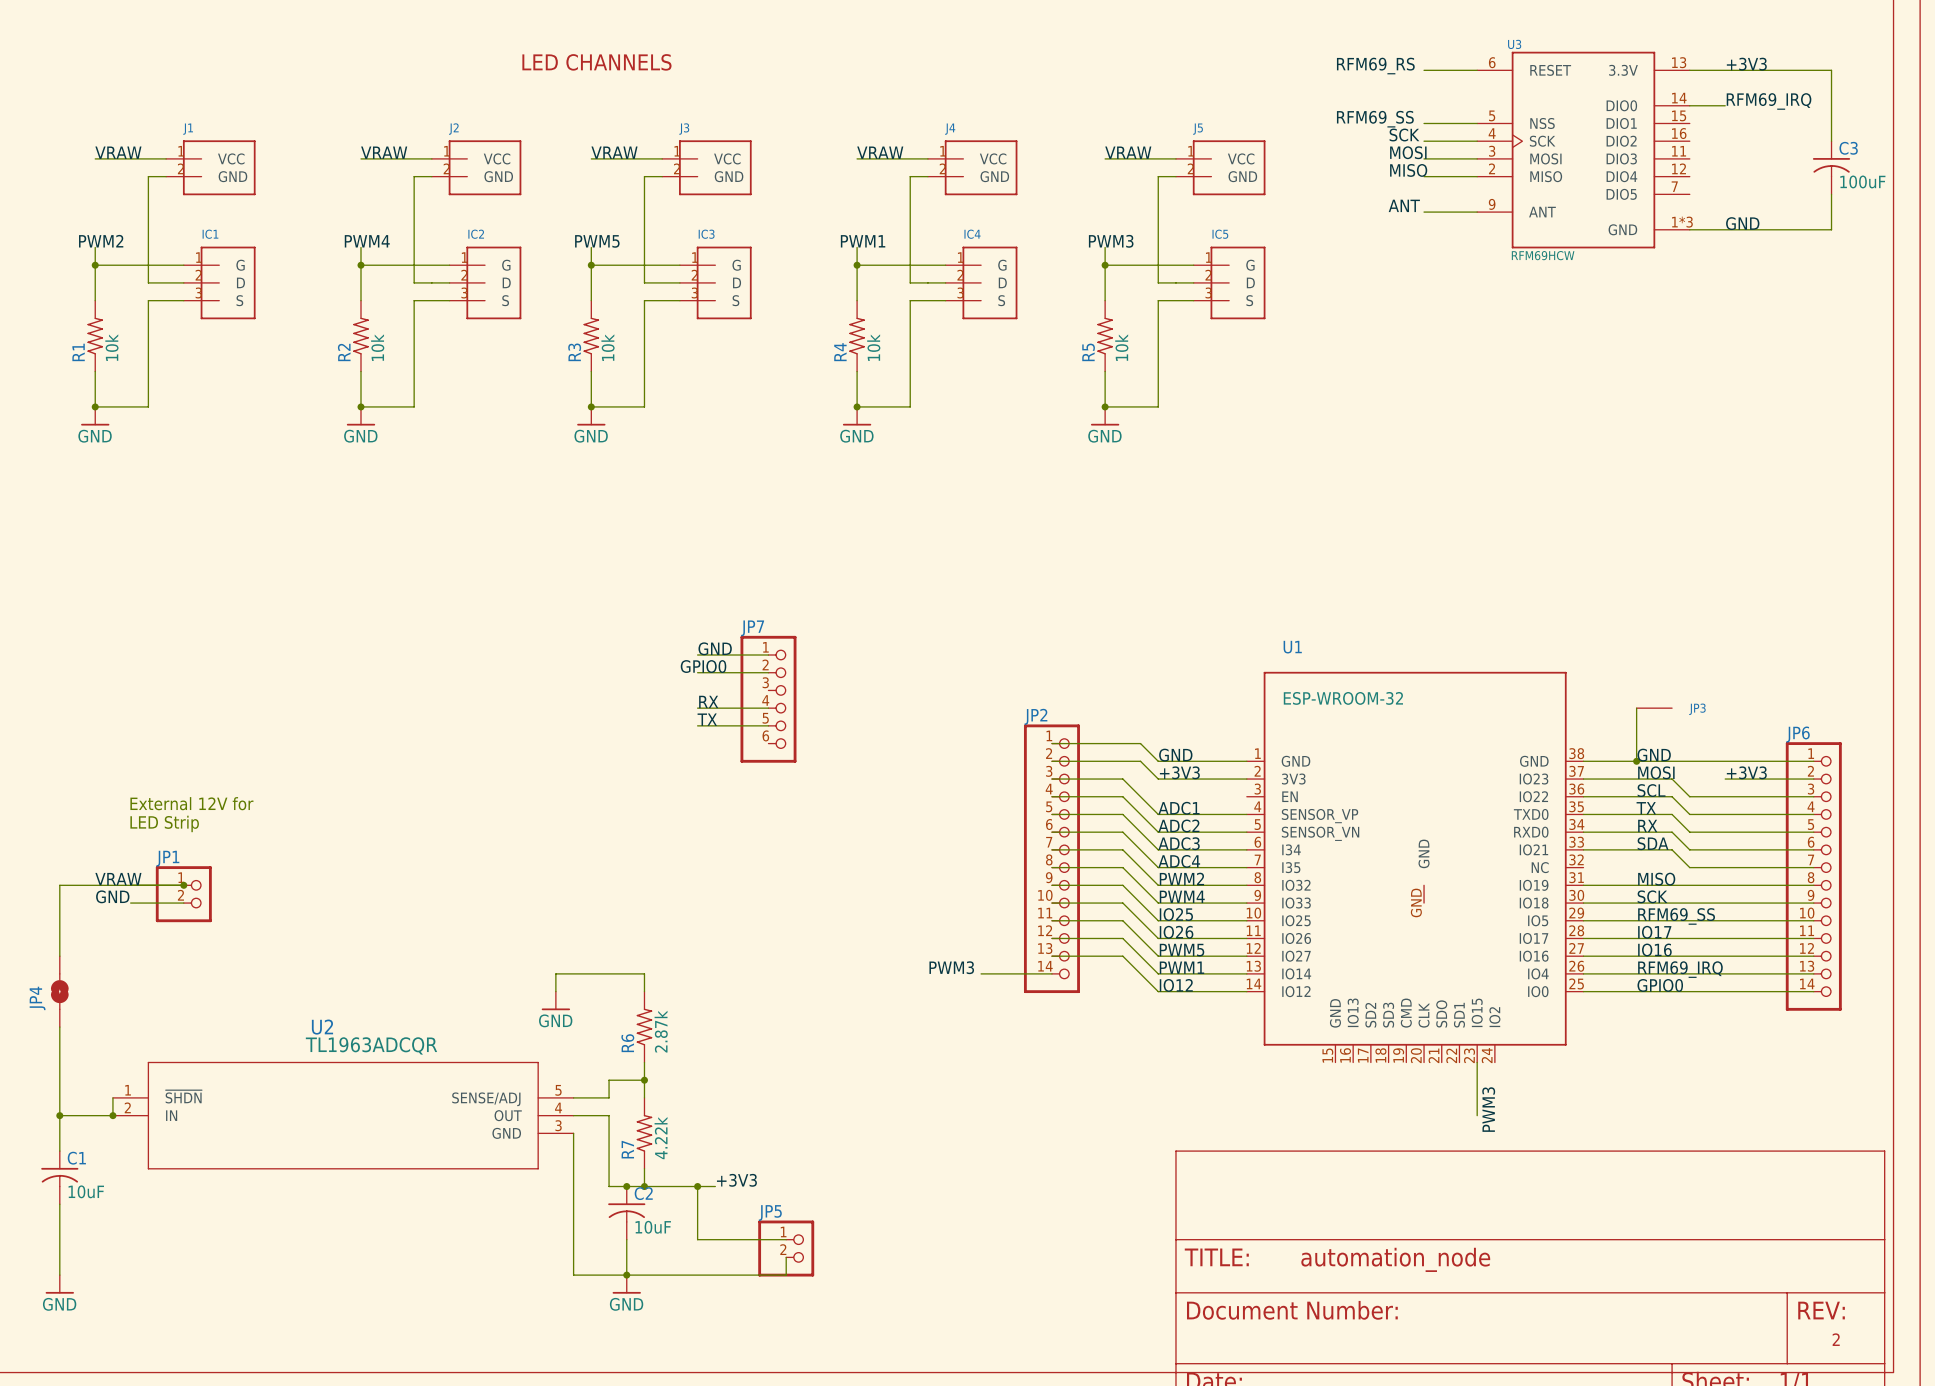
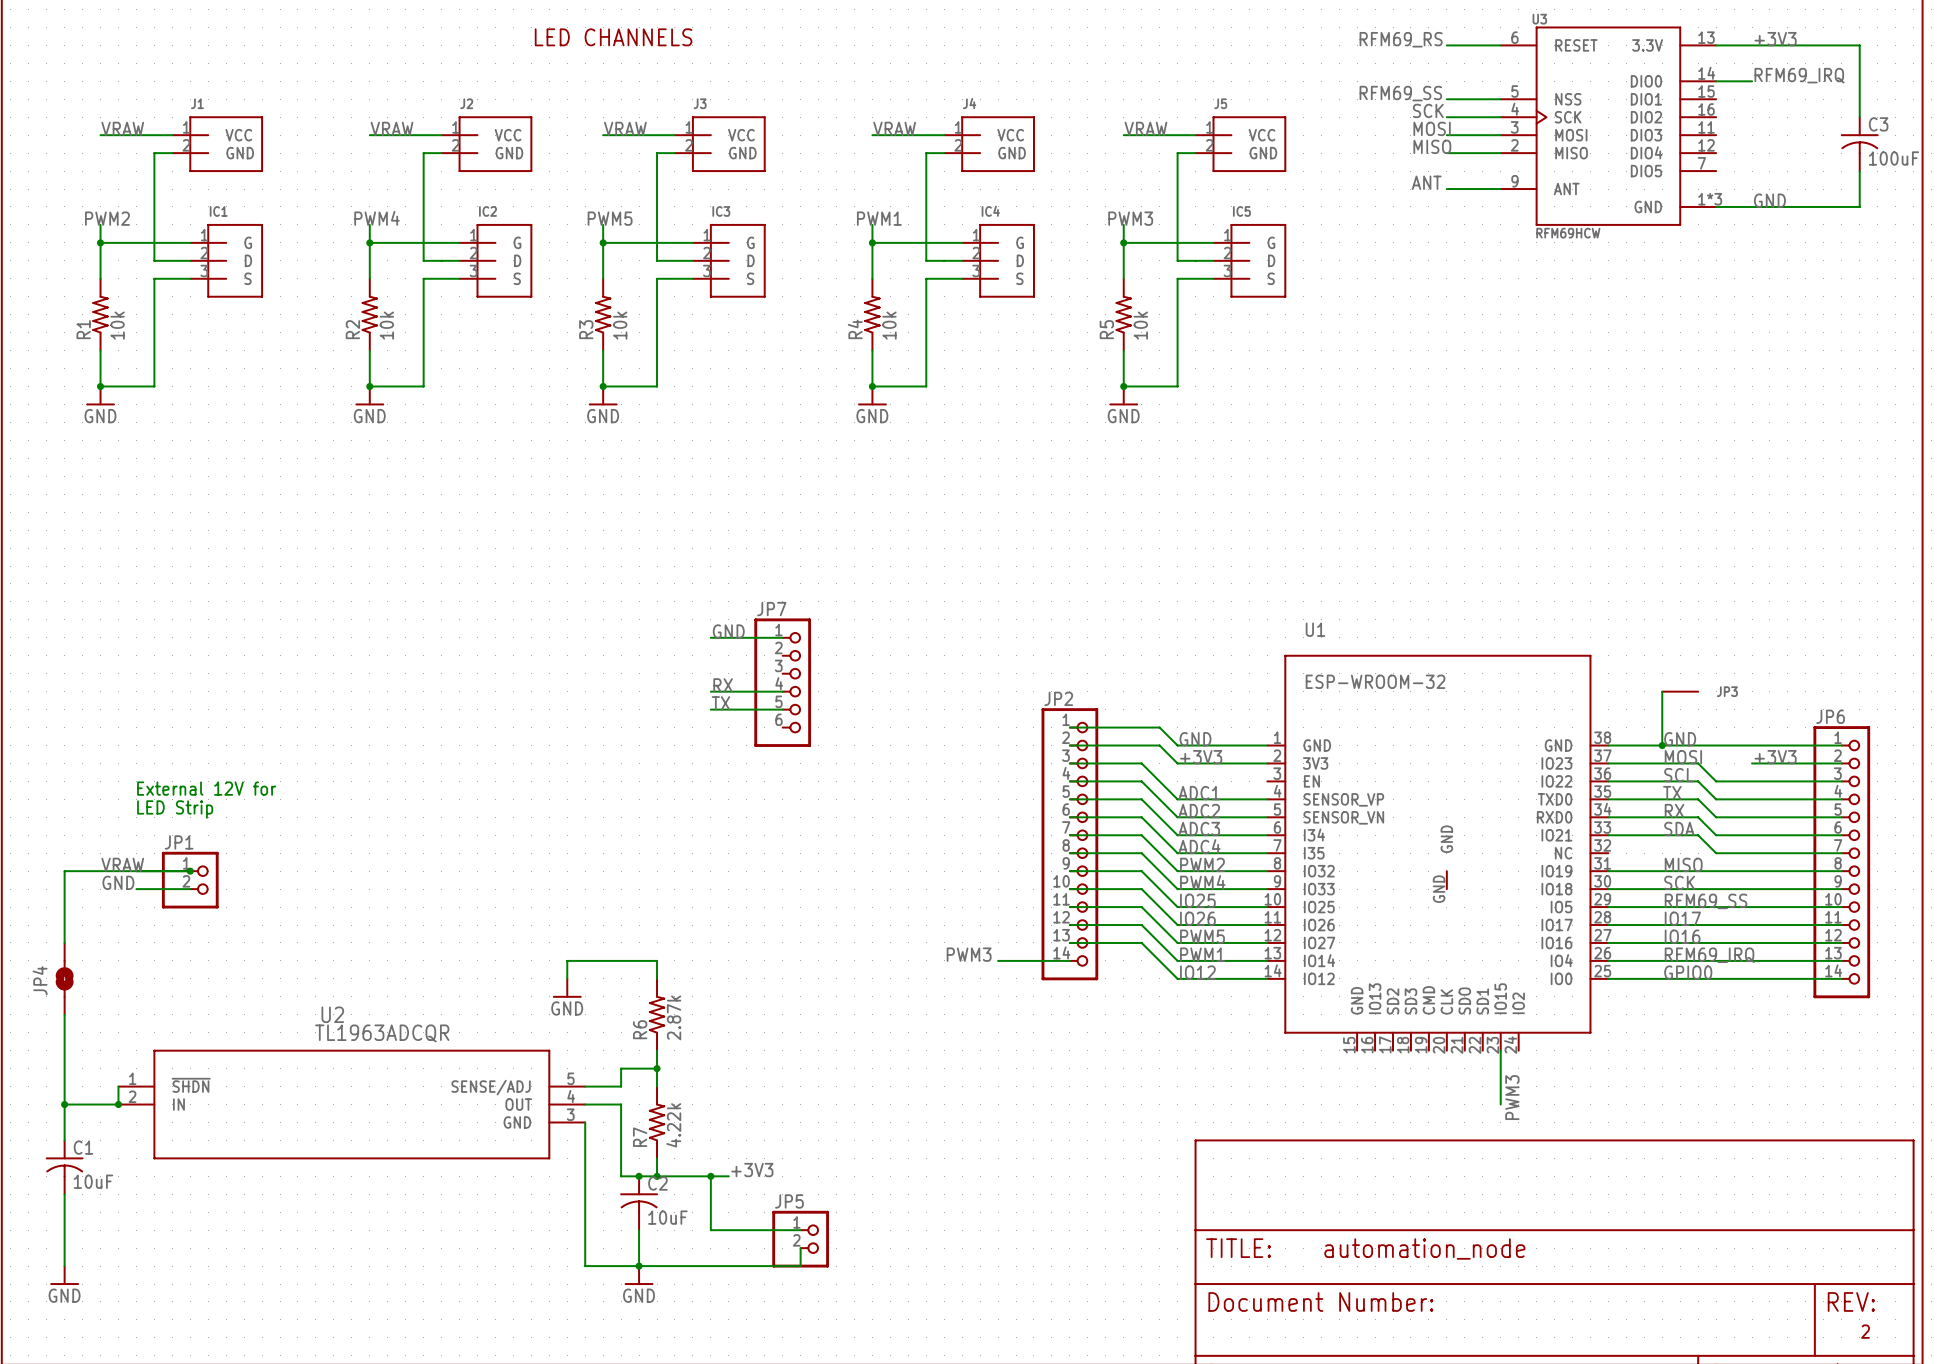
label: GPIO0 (703, 666) -> none
wire: (697, 672) (768, 672) -> none

